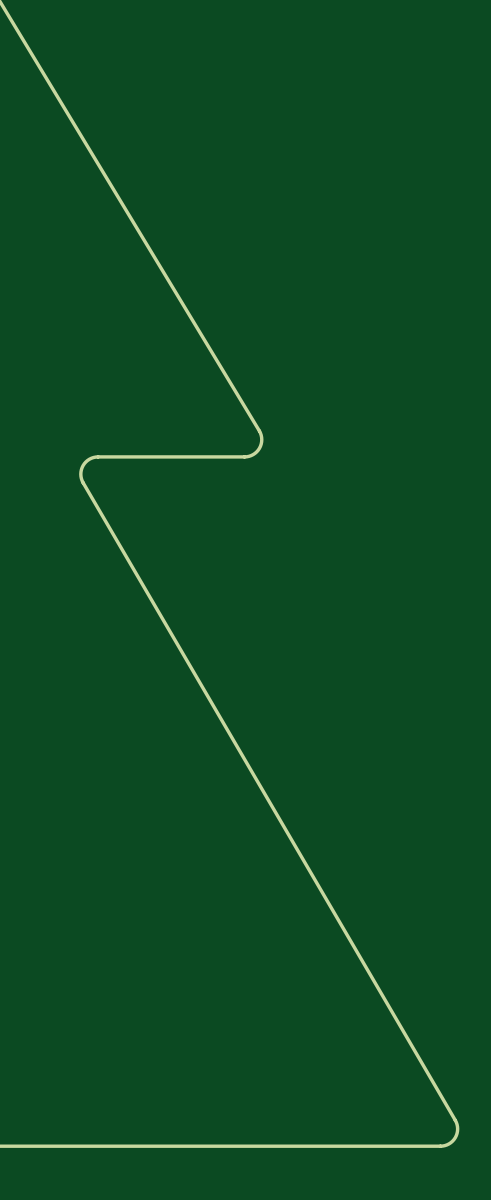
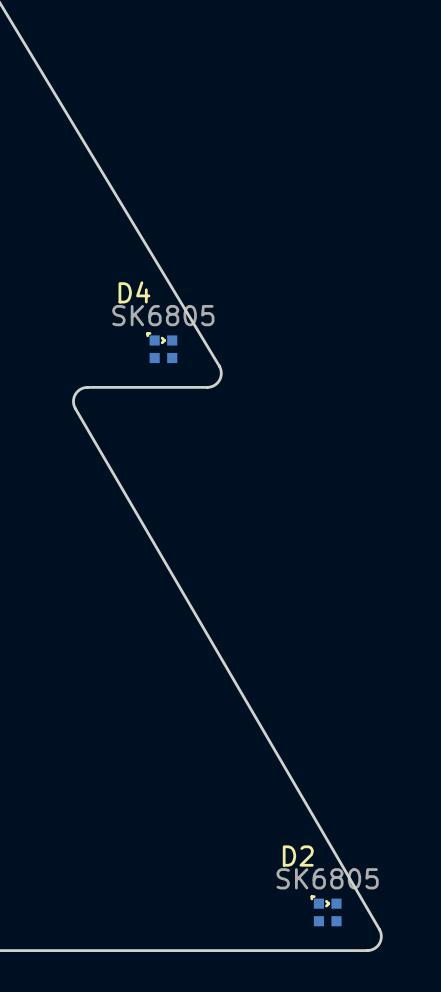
D4: none -> SK6805 (161, 347)
D2: none -> SK6805 (326, 910)

